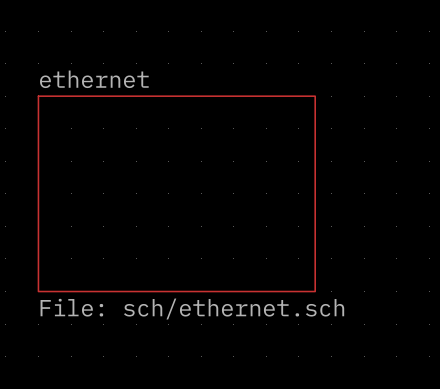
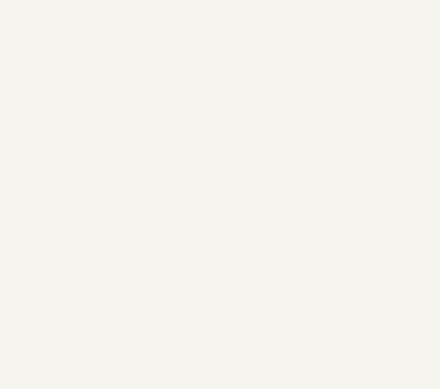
sheet ethernet: File: sch/ethernet.sch (176, 193) -> none

